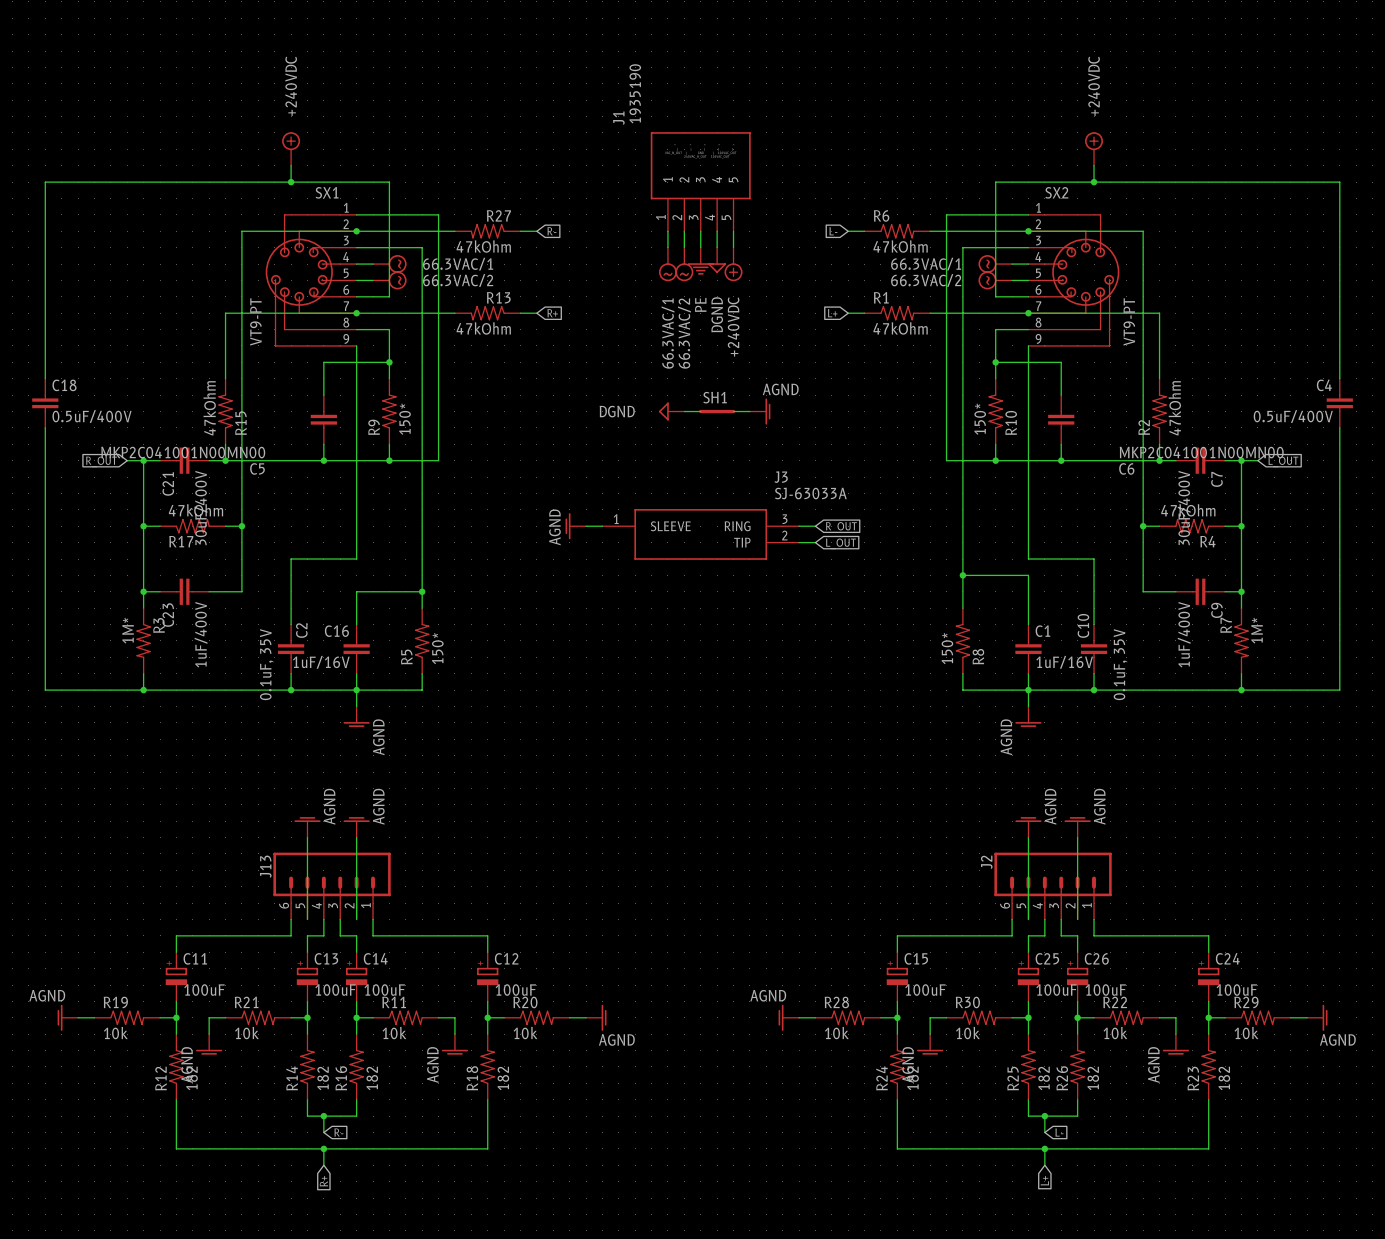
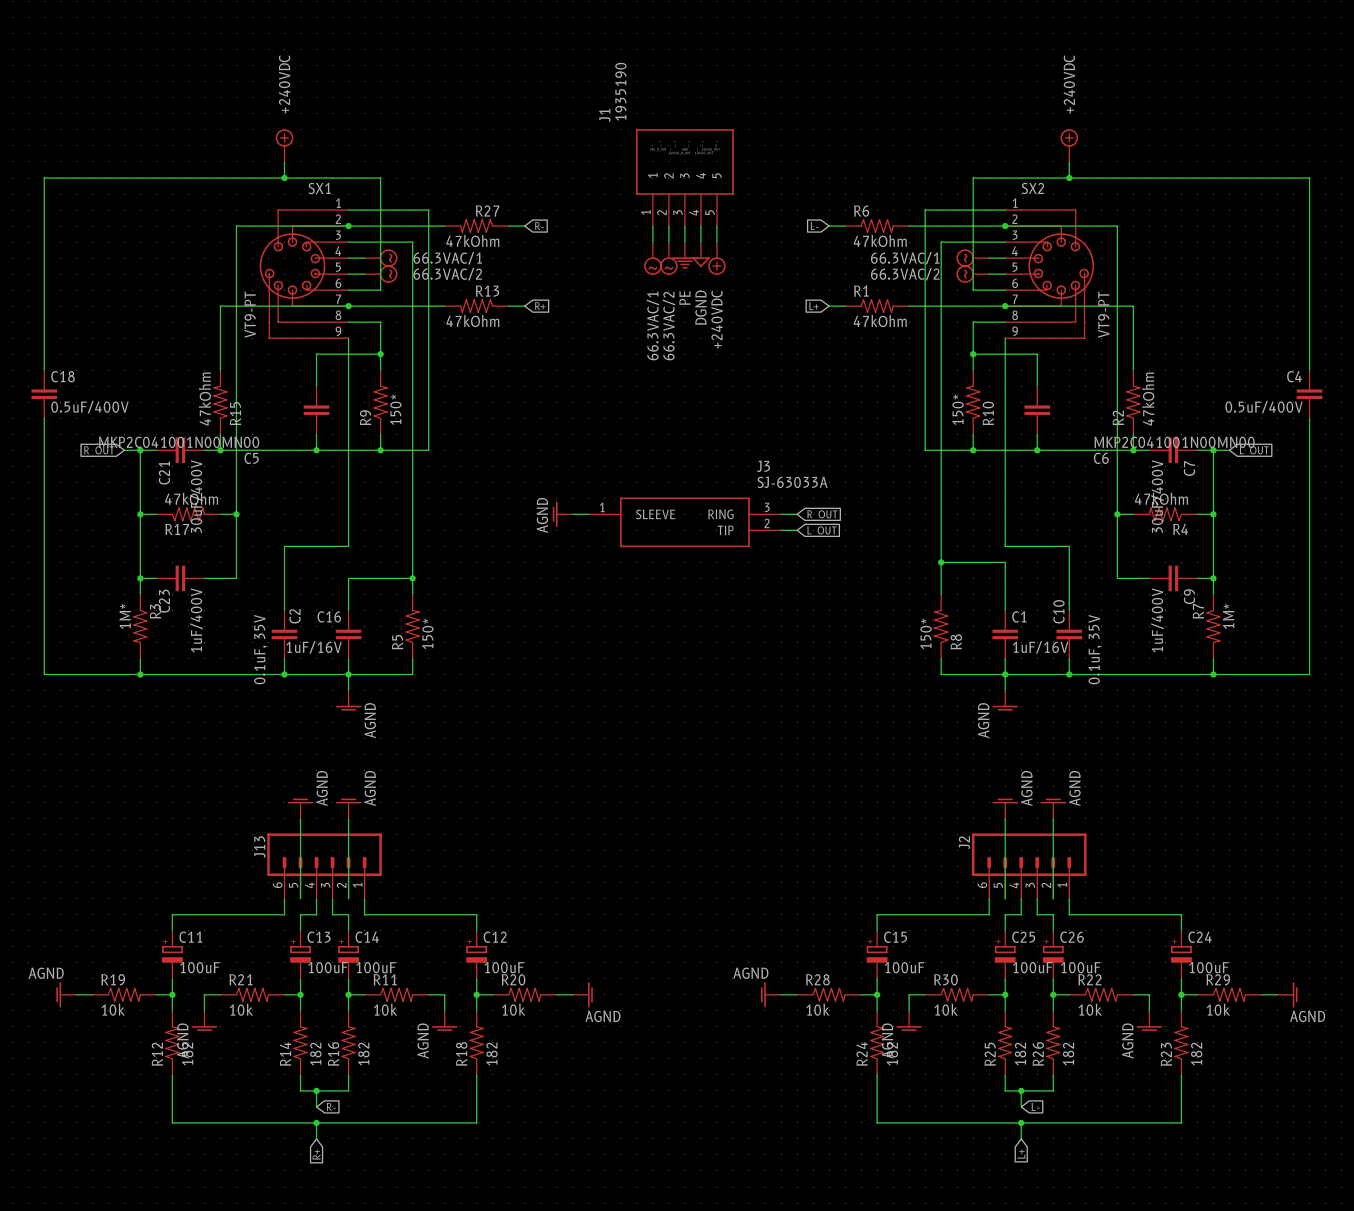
power symbol: DGND (671, 411) -> none
wire: (684, 411) (700, 411) -> none
SH1: (717, 411) -> none
wire: (733, 411) (749, 411) -> none
power symbol: AGND (760, 411) -> none

